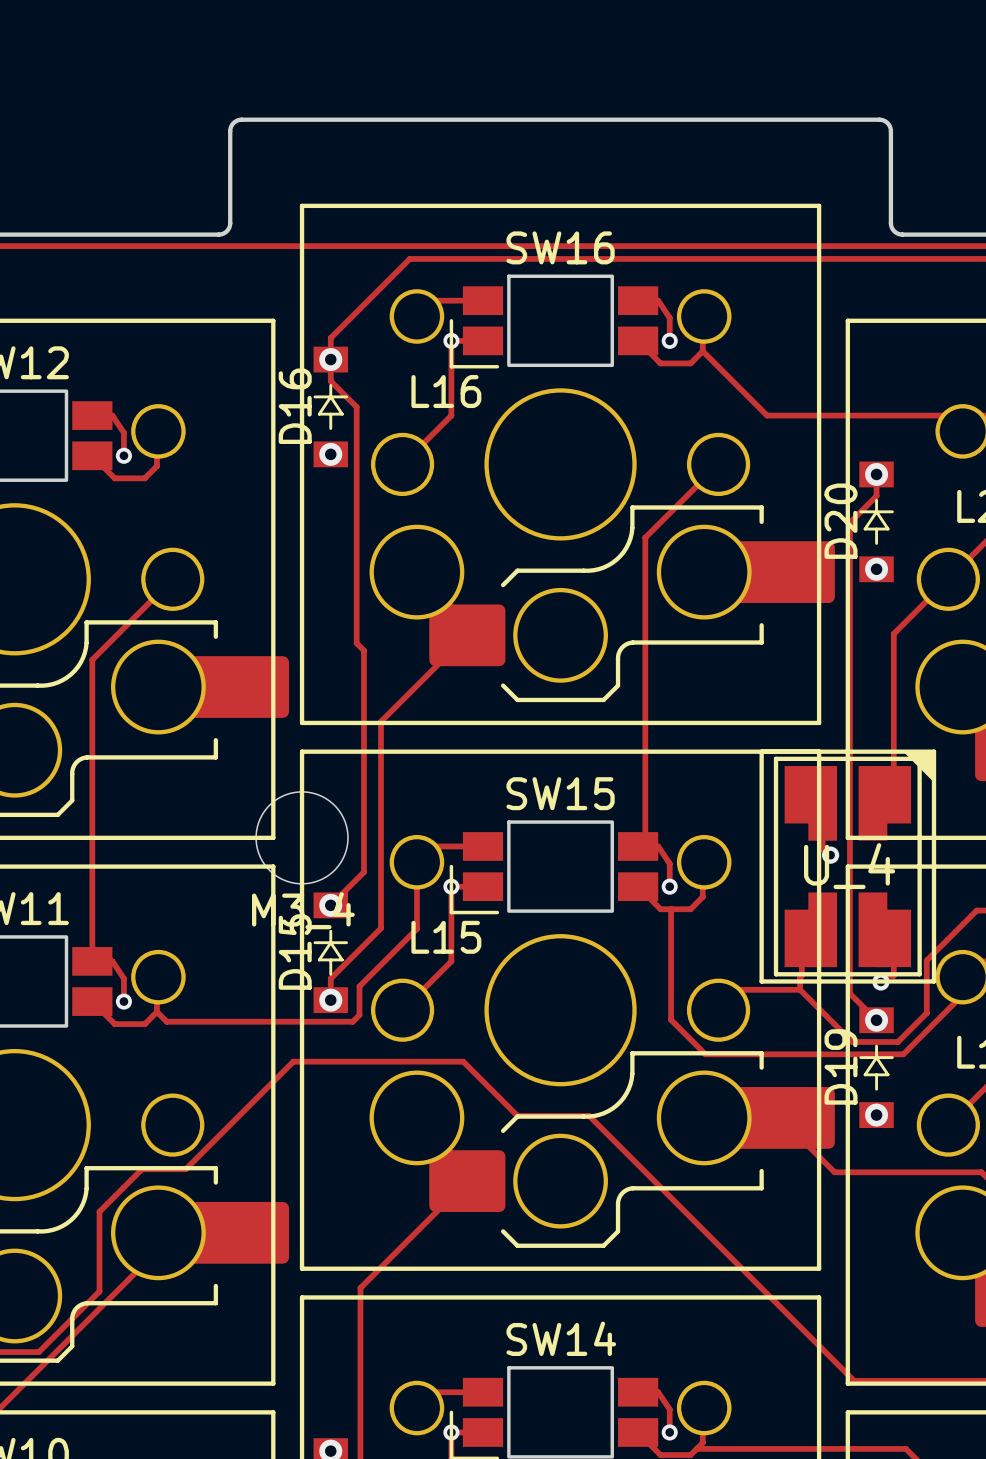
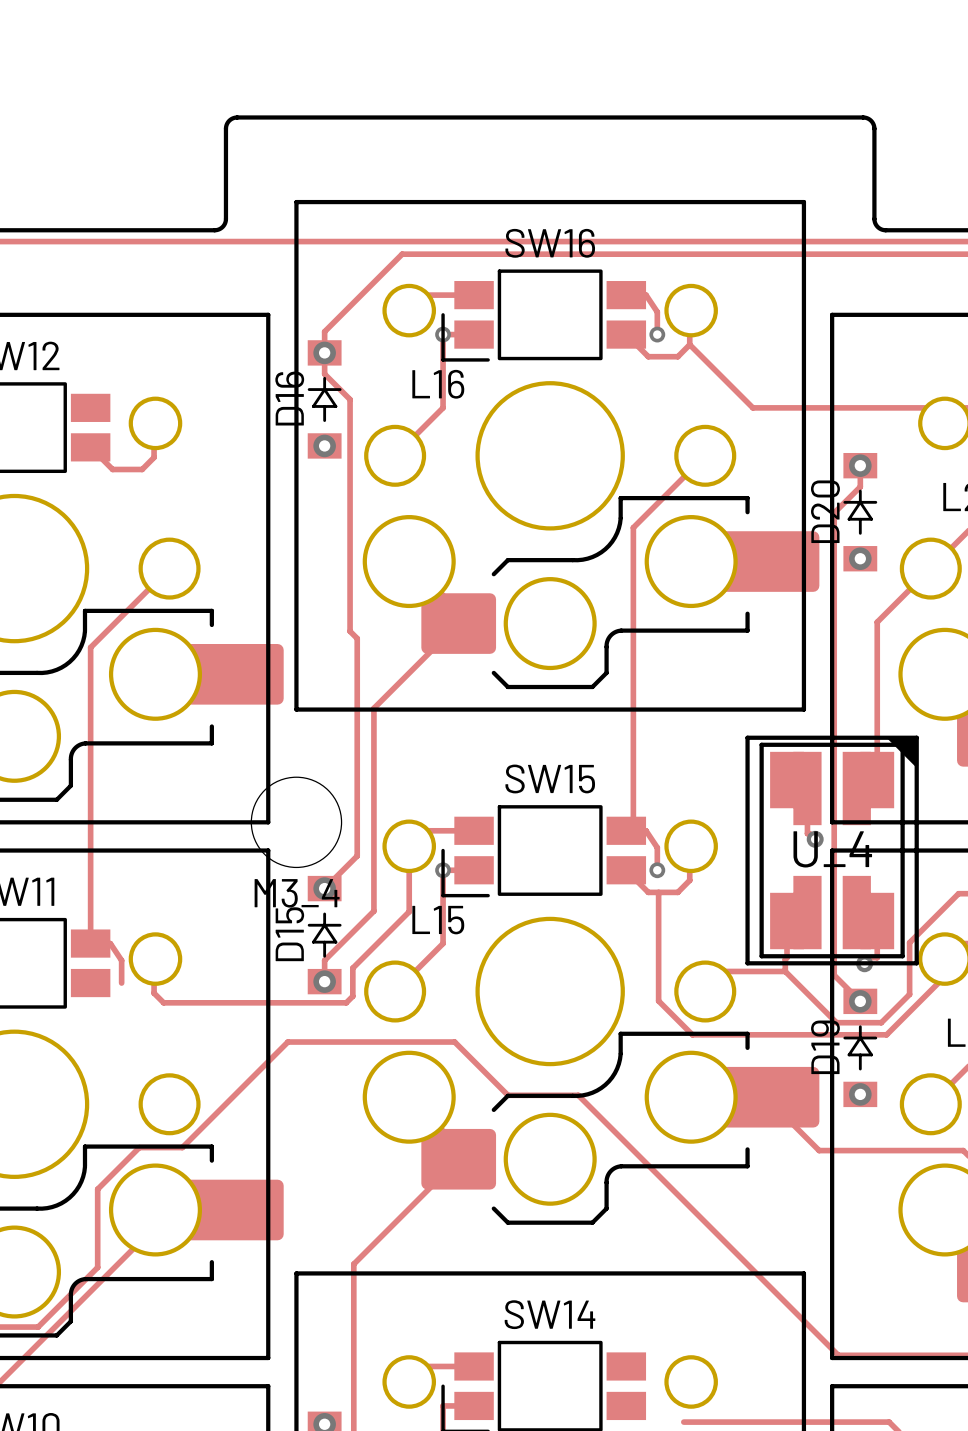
track: (92, 415) (112, 415) (123, 432) (123, 455) -> none
via: (123, 455) -> none
line: (302, 751) (302, 1268) (819, 1268) (819, 751) (302, 751) -> none
track: (92, 1001) (114, 1024) (144, 1024) (156, 1011) -> none
via: (123, 1001) -> none
track: (638, 1392) (658, 1392) (669, 1409) (669, 1432) -> none
track: (702, 1392) (702, 1442) (690, 1455) (660, 1455) (638, 1432) -> none
via: (451, 1432) -> none
via: (669, 1432) -> none

